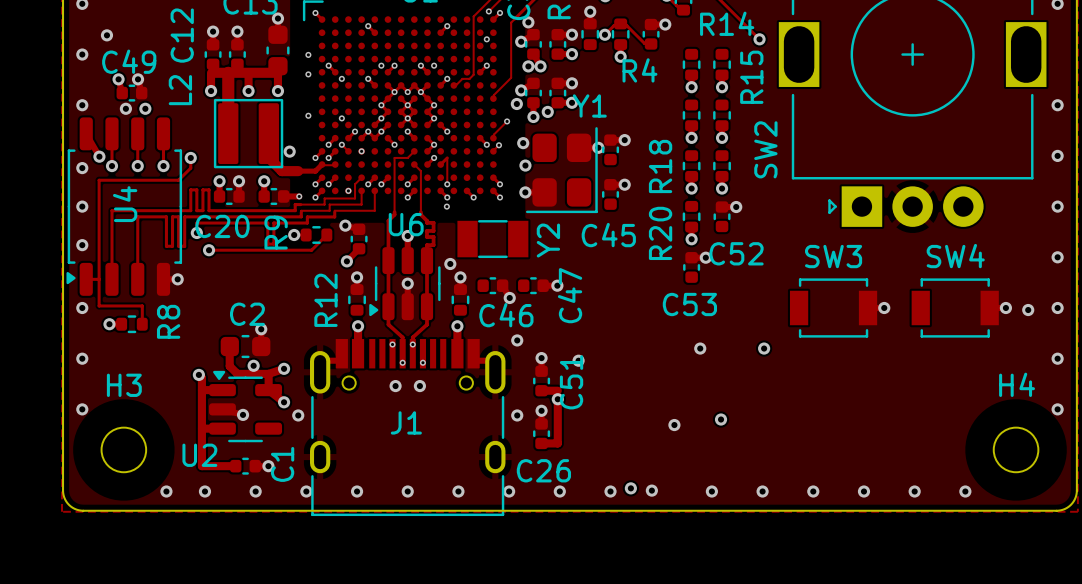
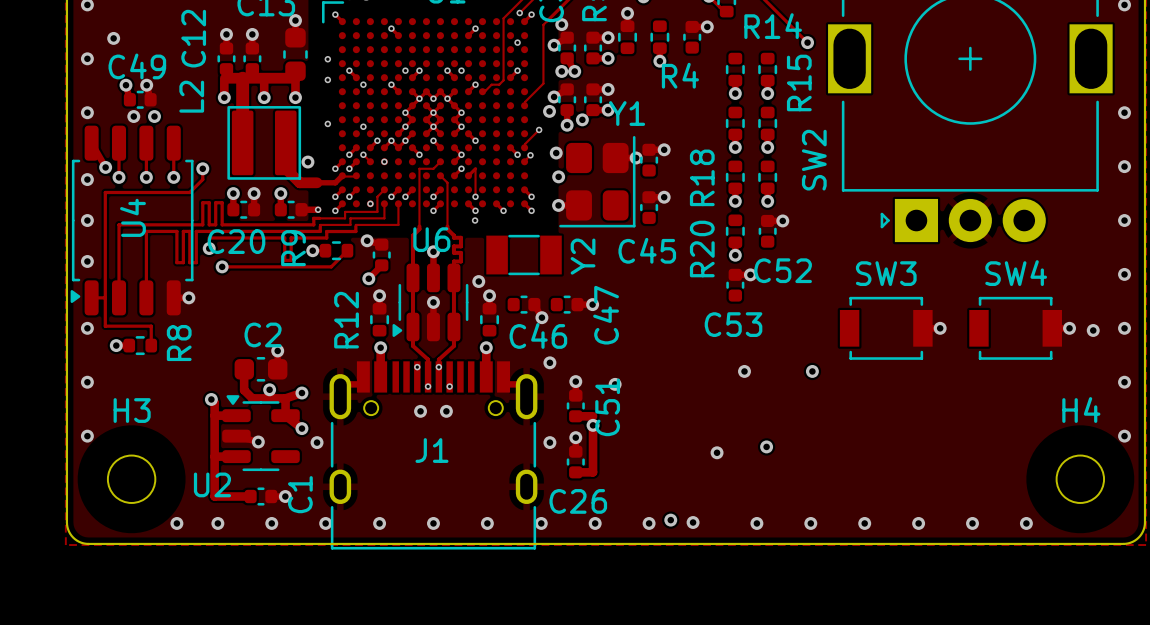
track: (604, 34) (614, 25) (620, 23) (626, 25) (644, 43) (651, 43) -> none
via: (604, 34) -> none

